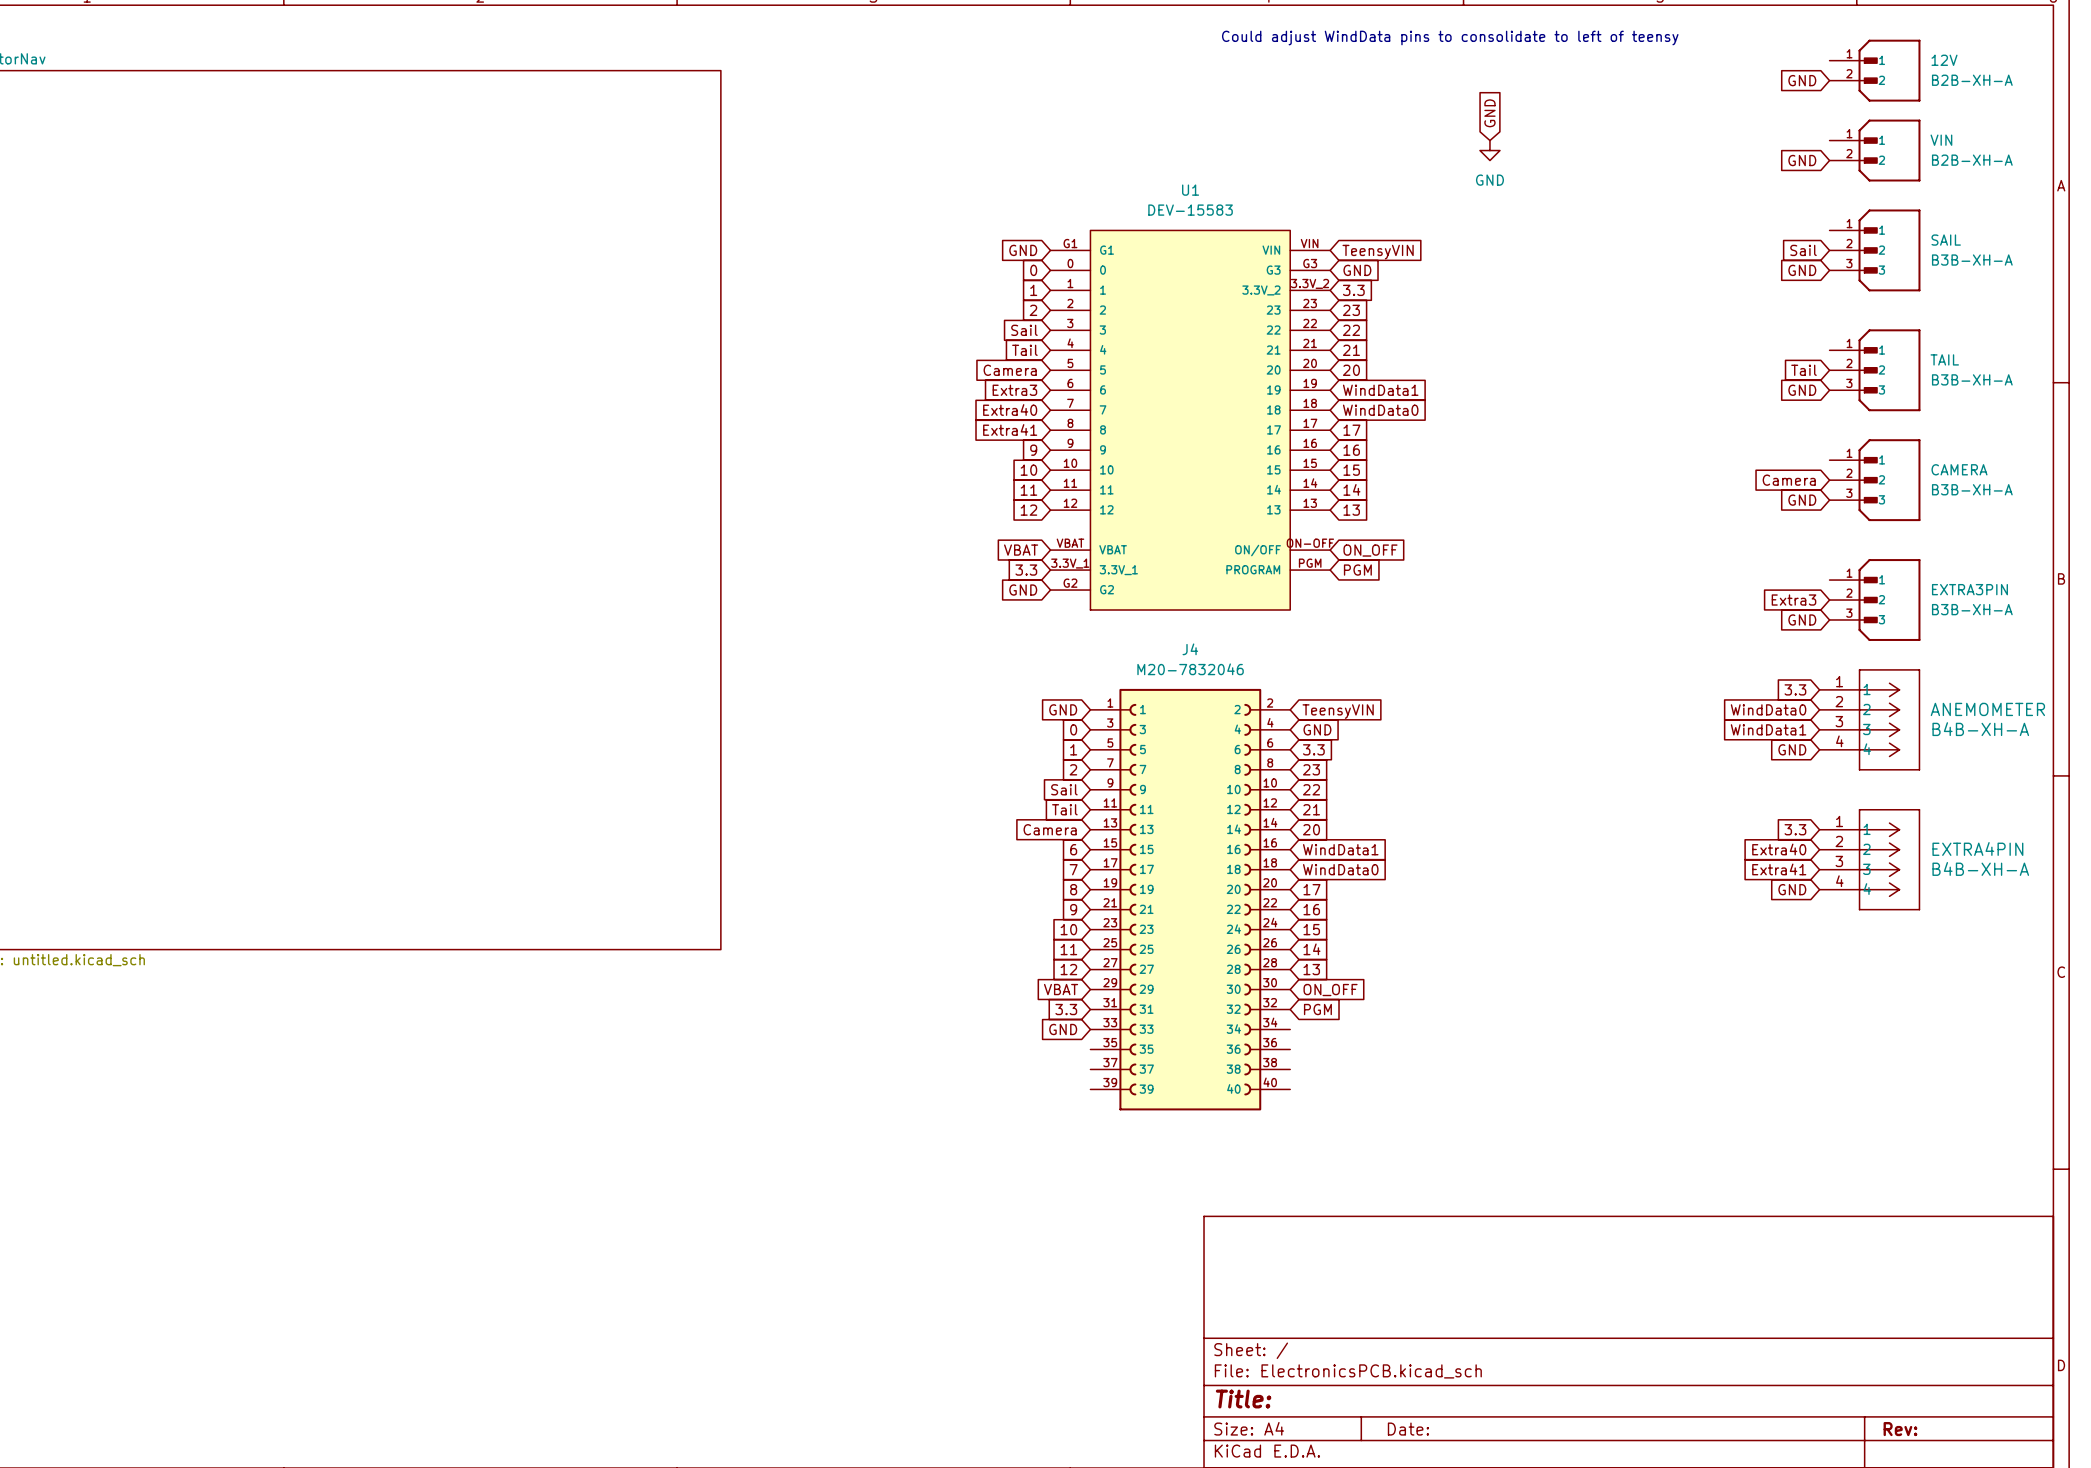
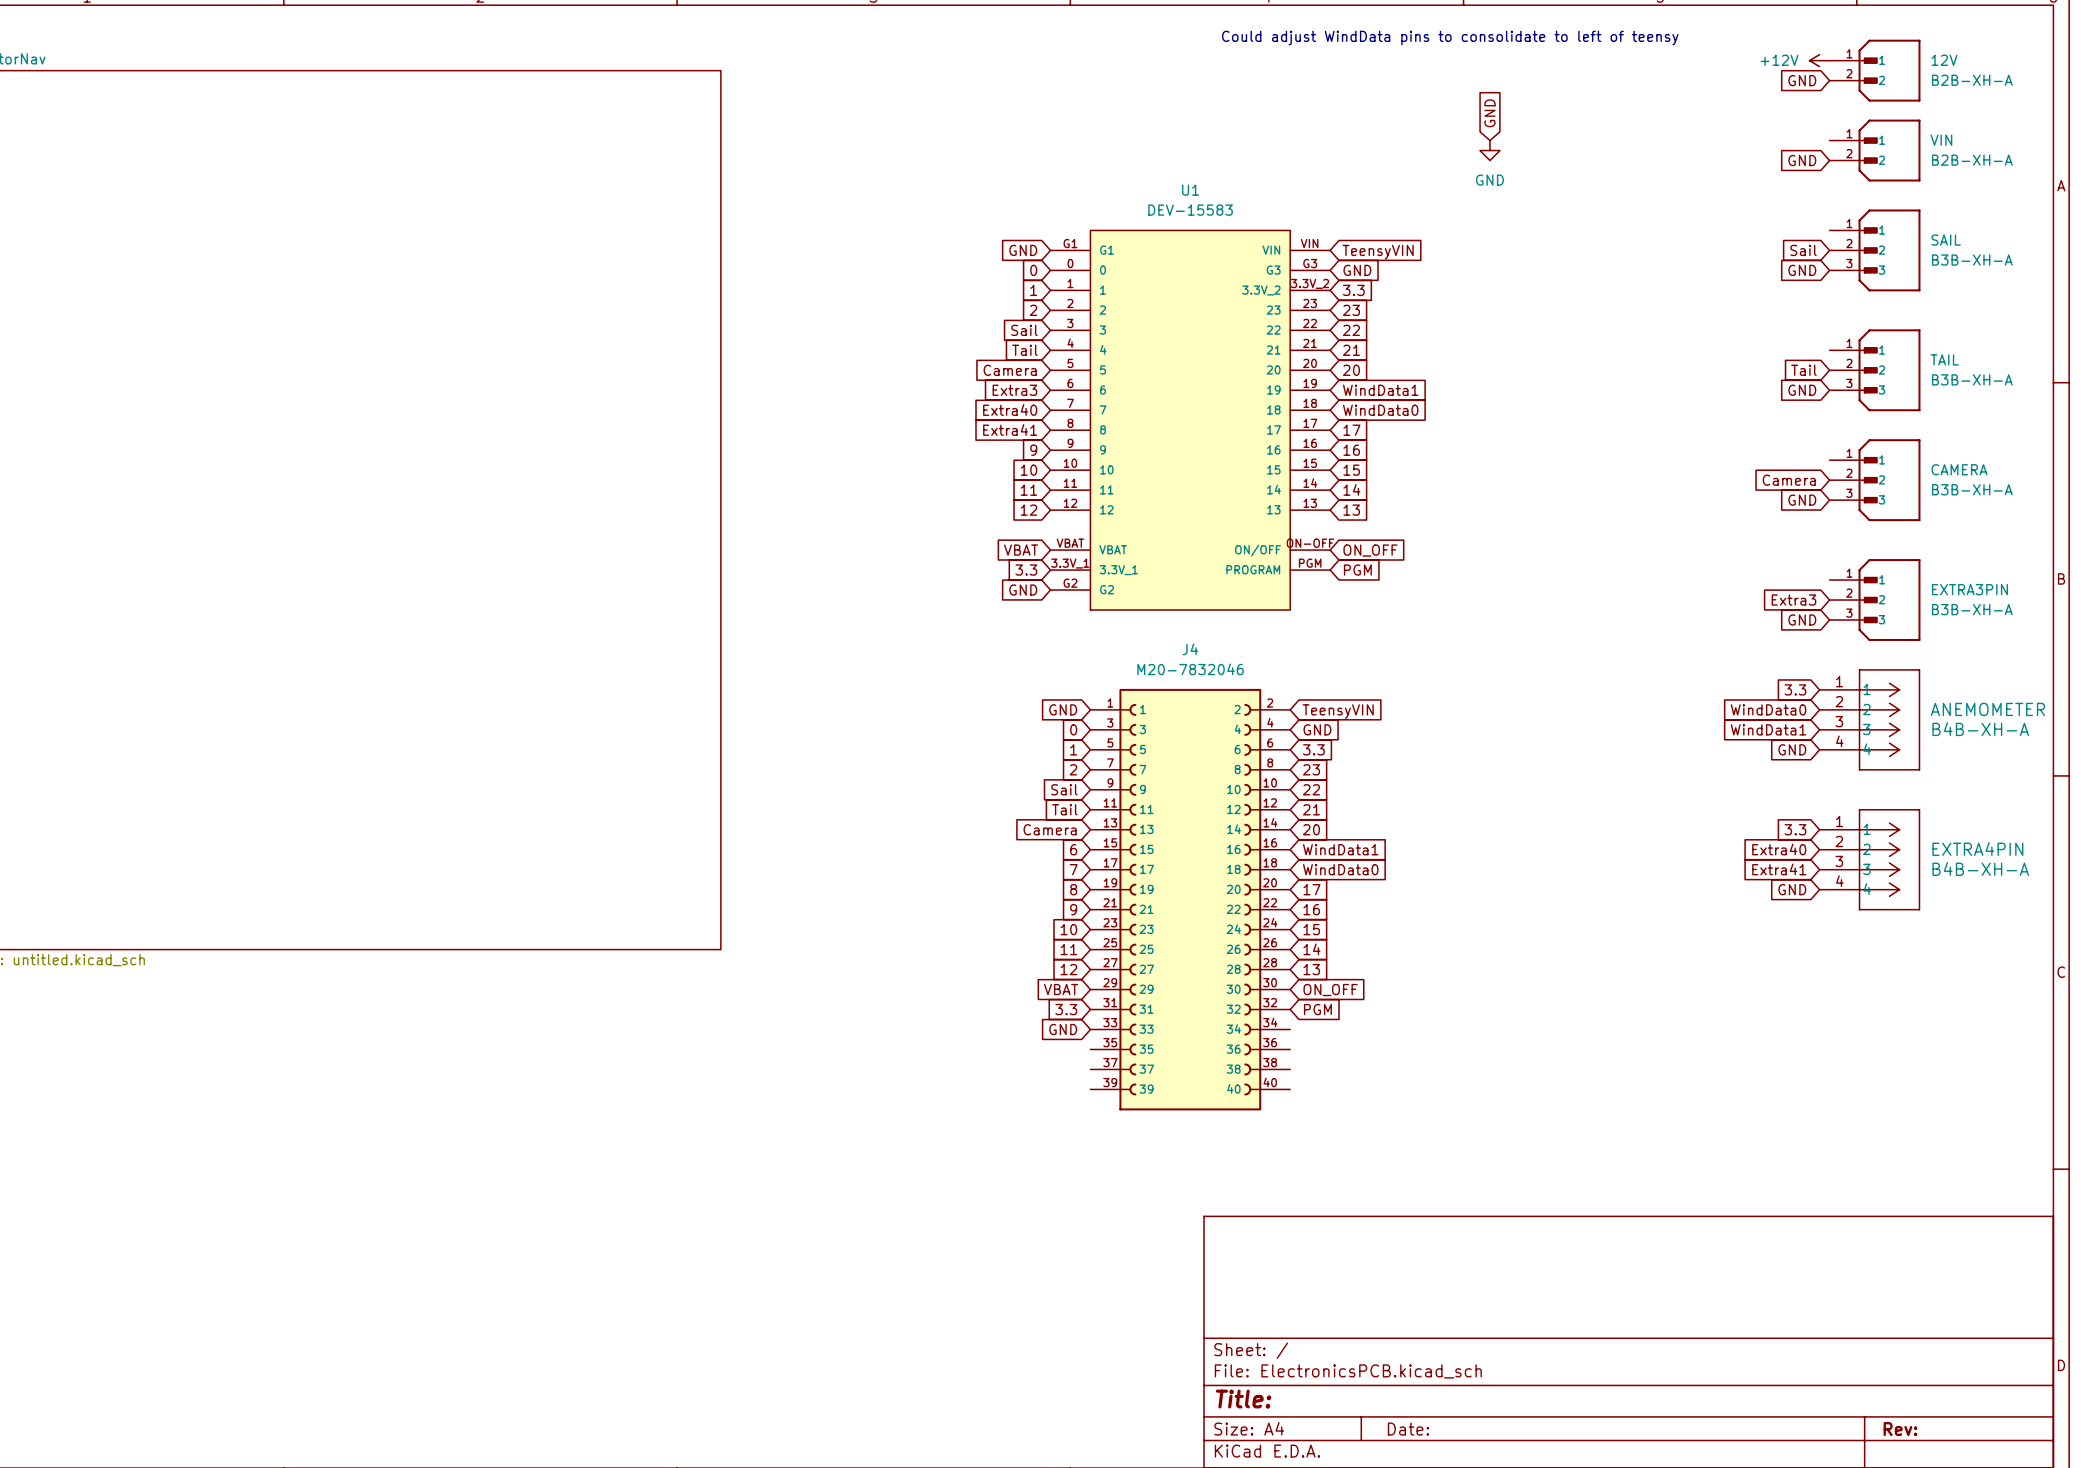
power symbol: none -> +12V (1819, 60)

